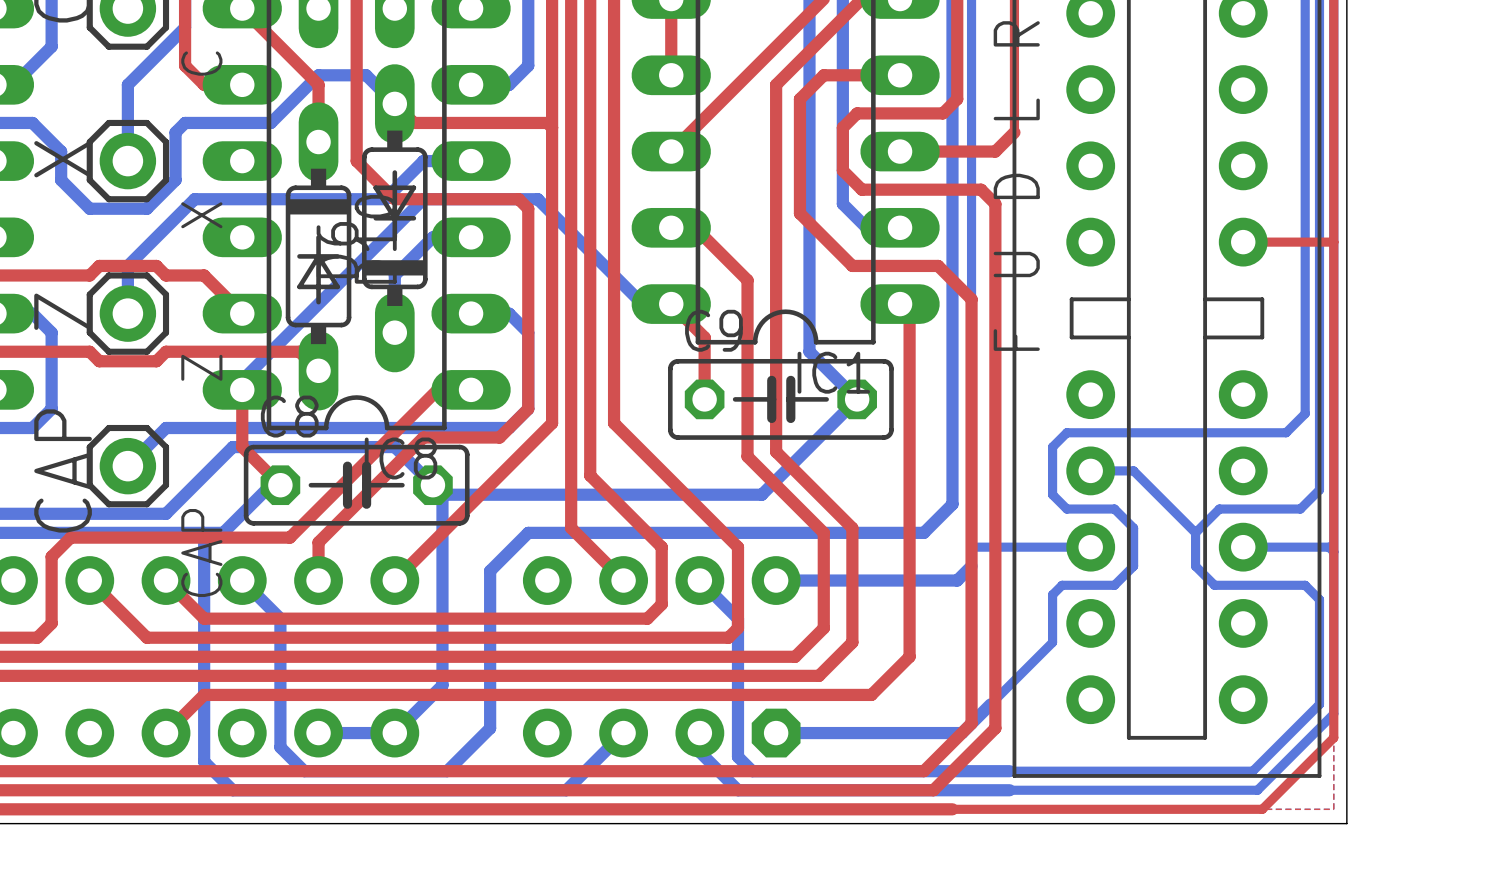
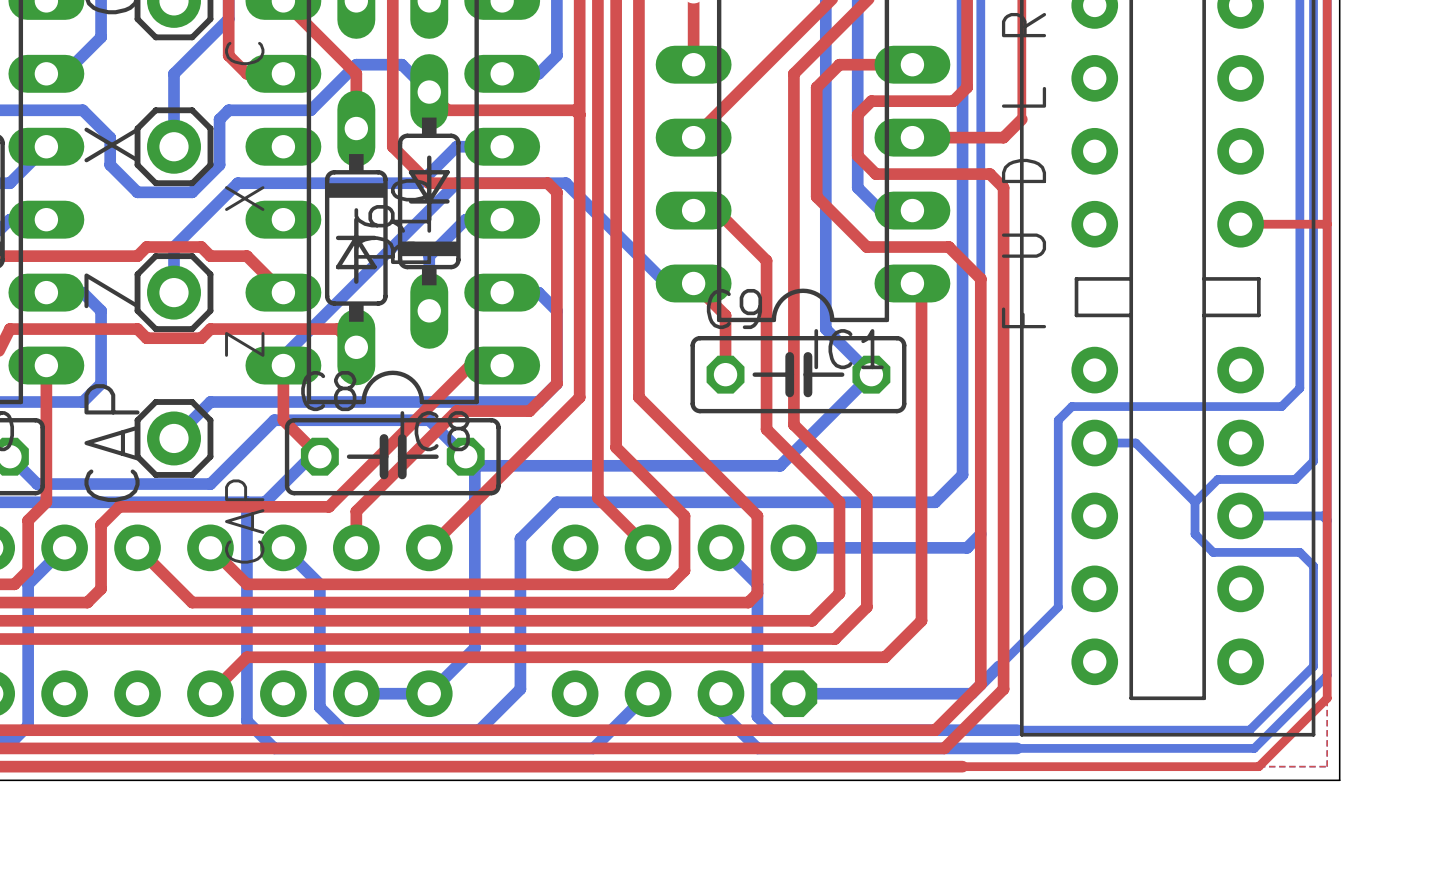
bottom track: (1052, 494) (1066, 509) (1114, 509) (1133, 528) (1133, 566) (1114, 585) (1062, 585) (1052, 594) -> (1058, 465) (1058, 561)
bottom track: (971, 547) (1090, 547) -> none

